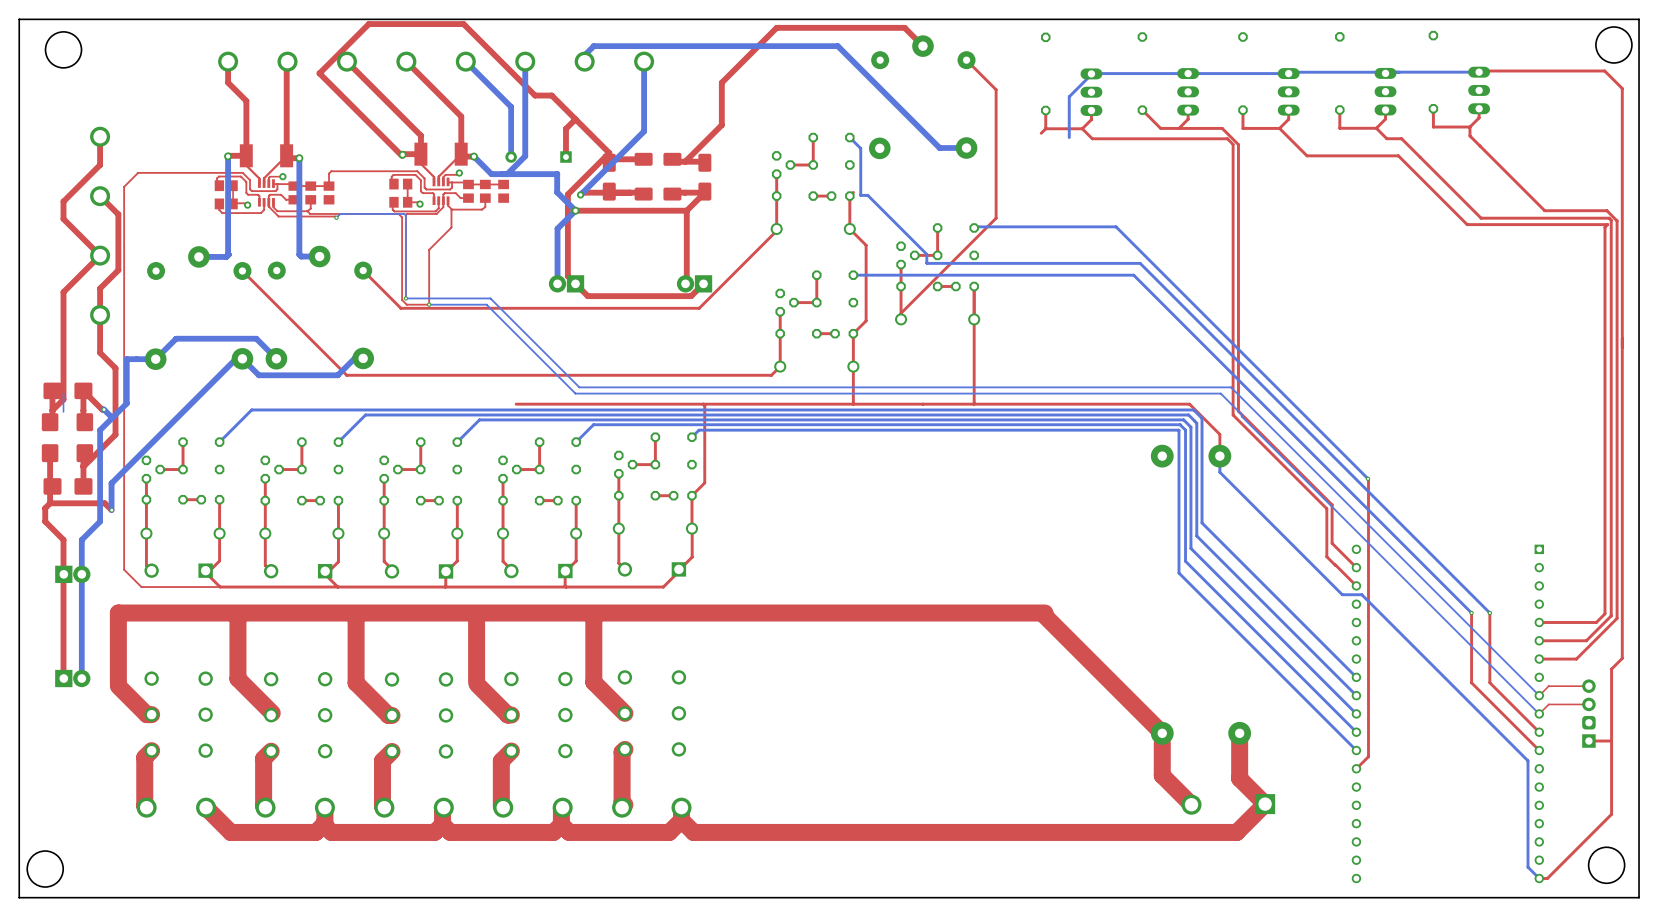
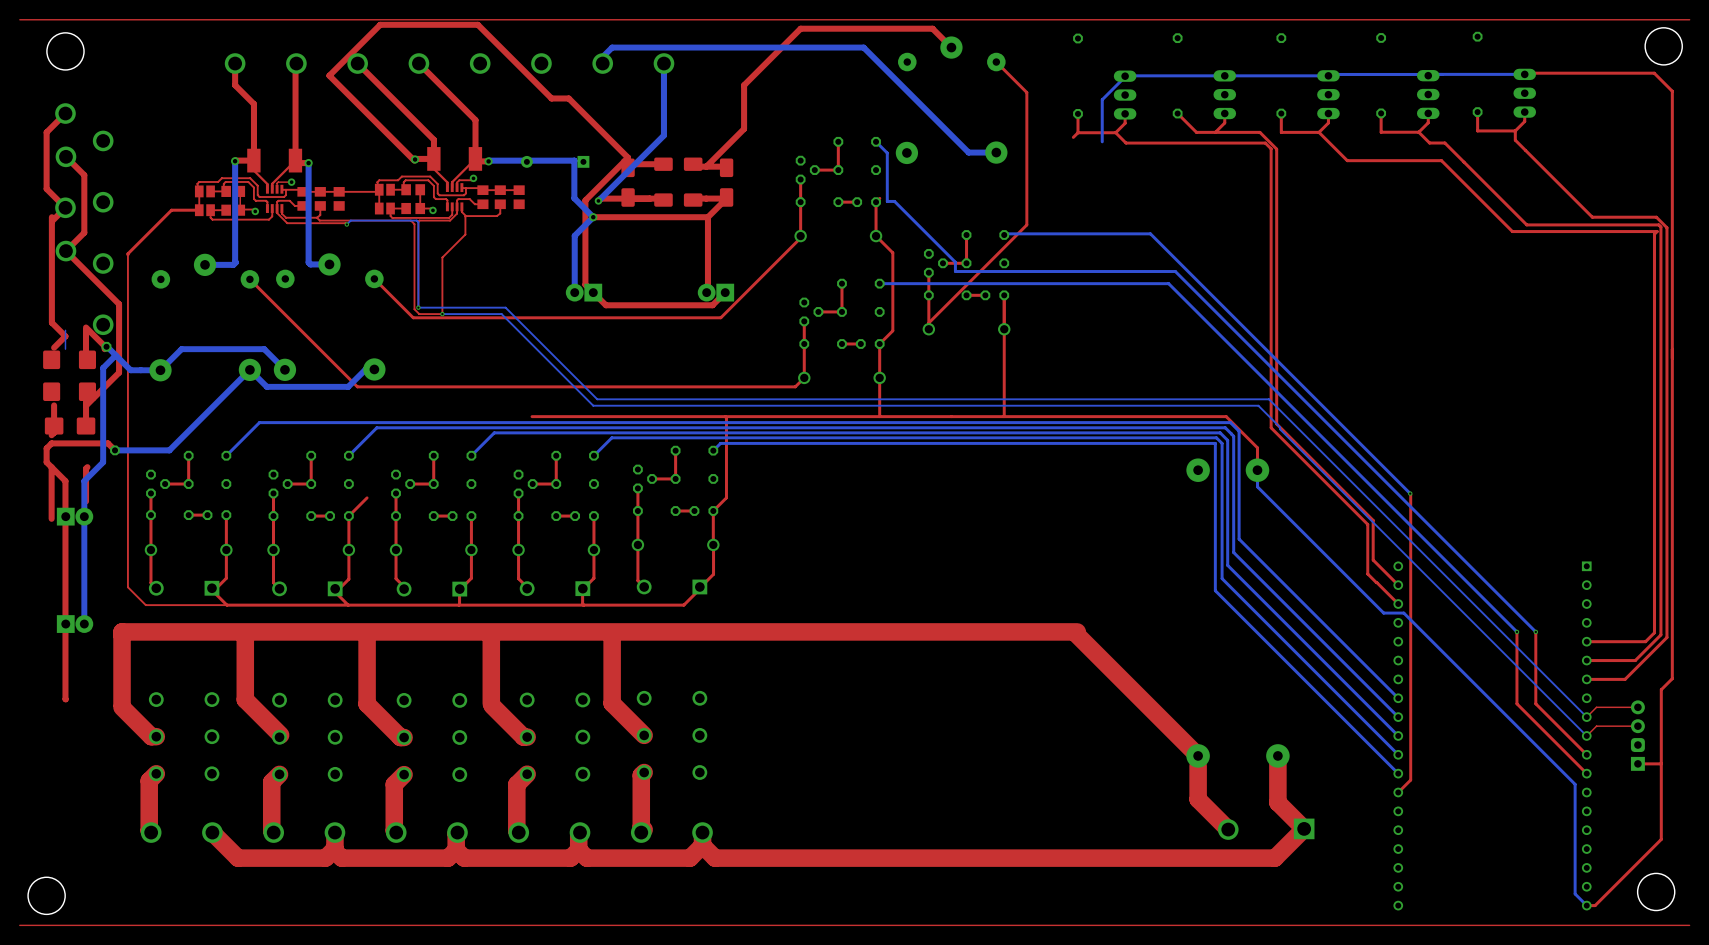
top track: none -> (1689, 19) (19, 19)
bottom track: (465, 61) (511, 106) (511, 157) -> none
bottom track: (525, 61) (525, 156) (507, 174) -> none
top track: none -> (65, 113) (46, 132) (46, 188) (65, 207) (51, 221)
part: none -> (65, 113)
top track: (575, 119) (565, 128) (565, 157) -> none
top track: (100, 136) (100, 164) (63, 201) (63, 219) (100, 255) (63, 292) (63, 399) (52, 410) -> none
top track: none -> (65, 156) (84, 175) (84, 232) (65, 251) (119, 304) (119, 372) (86, 405)
part: none -> (65, 156)
bottom track: none -> (574, 160) (574, 179)
bottom track: (473, 156) (491, 174) (557, 174) -> (488, 161) (574, 160)
top track: (389, 171) (331, 171) (328, 173) (329, 186) -> (379, 189) (377, 191) (339, 191)
top track: none -> (401, 176) (398, 180) (379, 180) (377, 182) (379, 189)
top track: (215, 172) (138, 172) (124, 186) -> (221, 178) (218, 181) (199, 181) (197, 183) (199, 210) (171, 210) (127, 254)
top track: none -> (379, 189) (379, 208)
part: none -> (384, 189)
top track: none -> (406, 189) (390, 189)
part: none -> (204, 191)
top track: none -> (226, 191) (210, 191)
top track: (124, 186) (124, 246) -> none
top track: (100, 196) (118, 214) (118, 270) (100, 288) (100, 352) (115, 368) (115, 434) (83, 466) -> none
part: none -> (65, 207)
part: none -> (384, 208)
top track: (393, 202) (392, 209) (394, 211) -> (406, 208) (390, 208) (390, 216) (392, 217) (406, 217)
part: none -> (204, 210)
top track: (219, 203) (219, 210) (222, 213) -> (226, 210) (210, 210) (210, 217) (212, 219) (229, 219)
top track: none -> (51, 217) (51, 322) (65, 336) (54, 347)
part: none -> (65, 251)
top track: none -> (86, 327) (104, 346) (104, 349)
top track: none -> (86, 329) (87, 359)
bottom track: none -> (106, 346) (130, 370)
part: none -> (106, 346)
bottom track: (242, 358) (236, 358) (111, 483) (111, 510) -> (249, 369) (169, 450) (114, 450)
bottom track: (126, 359) (126, 403) (100, 430) -> (115, 355) (103, 368) (103, 443)
part: none -> (51, 375)
part: none -> (87, 375)
part: (67, 390) -> none
top track: (83, 390) (103, 409) -> none
bottom track: (63, 393) (63, 411) -> (65, 330) (65, 349)
bottom track: (103, 409) (112, 417) -> none
part: (104, 409) -> none
part: none -> (70, 426)
part: none -> (114, 450)
part: (50, 437) -> none
part: (84, 437) -> none
bottom track: (100, 448) (100, 521) (81, 539) -> (103, 462) (84, 481) (84, 556)
top track: none -> (367, 497) (348, 516)
part: (67, 486) -> none
part: none -> (75, 516)
top track: (111, 510) (104, 503) (50, 503) (45, 508) (45, 521) (63, 539) -> (114, 450) (108, 443) (51, 443) (46, 448) (46, 462) (65, 481) (65, 556)
part: (111, 510) -> none
part position: (72, 574) -> (75, 624)
bottom track: (81, 605) (81, 678) -> none
part: (72, 678) -> none
board edge: (19, 897) (19, 19) (1639, 19) (1639, 897) (19, 897) -> none
top track: none -> (1689, 925) (19, 925)

